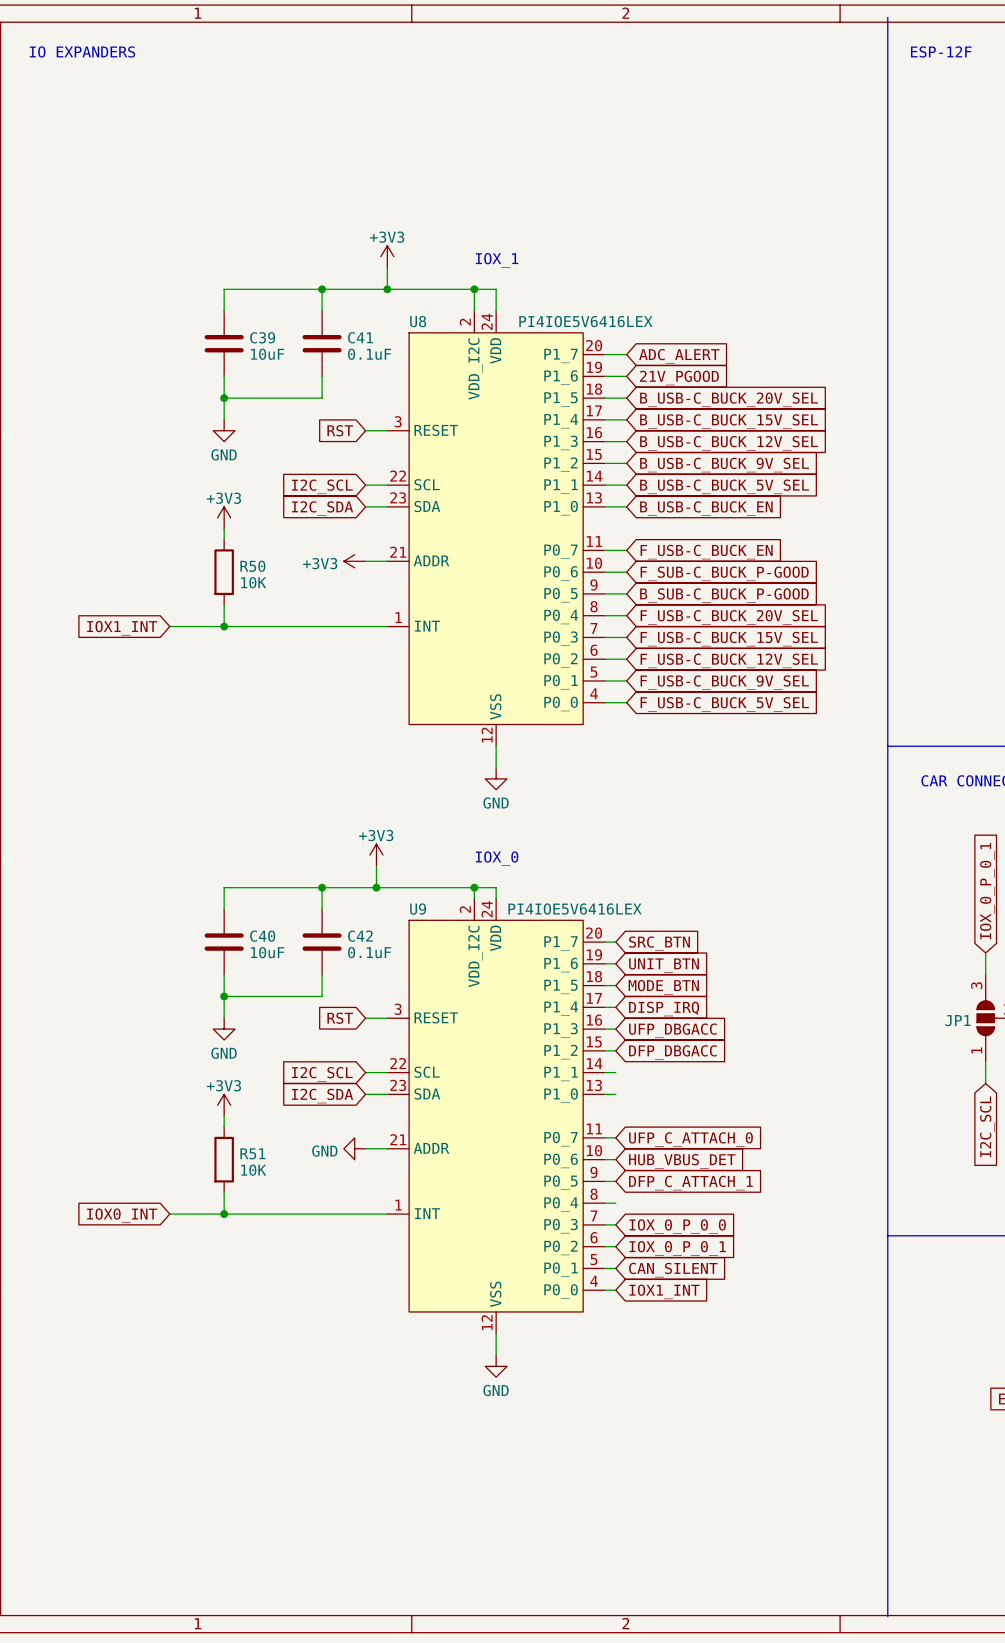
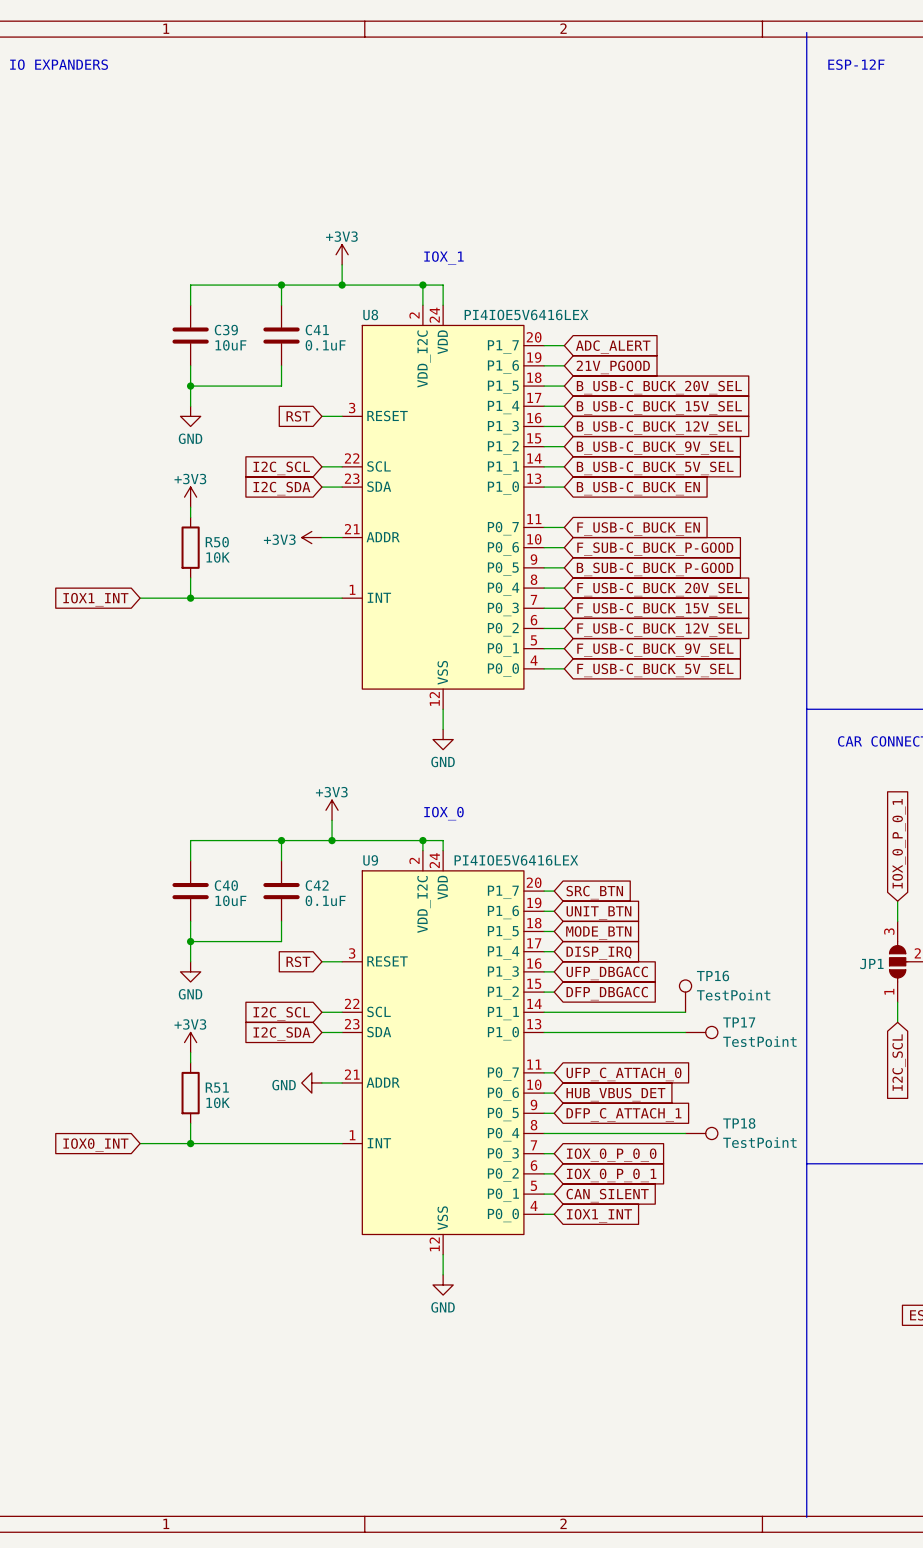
TP16: none -> TestPoint (685, 996)
wire: none -> (554, 1012) (685, 1012)
wire: none -> (554, 1032) (685, 1032)
TP17: none -> TestPoint (701, 1032)
wire: none -> (554, 1133) (685, 1133)
TP18: none -> TestPoint (701, 1133)

